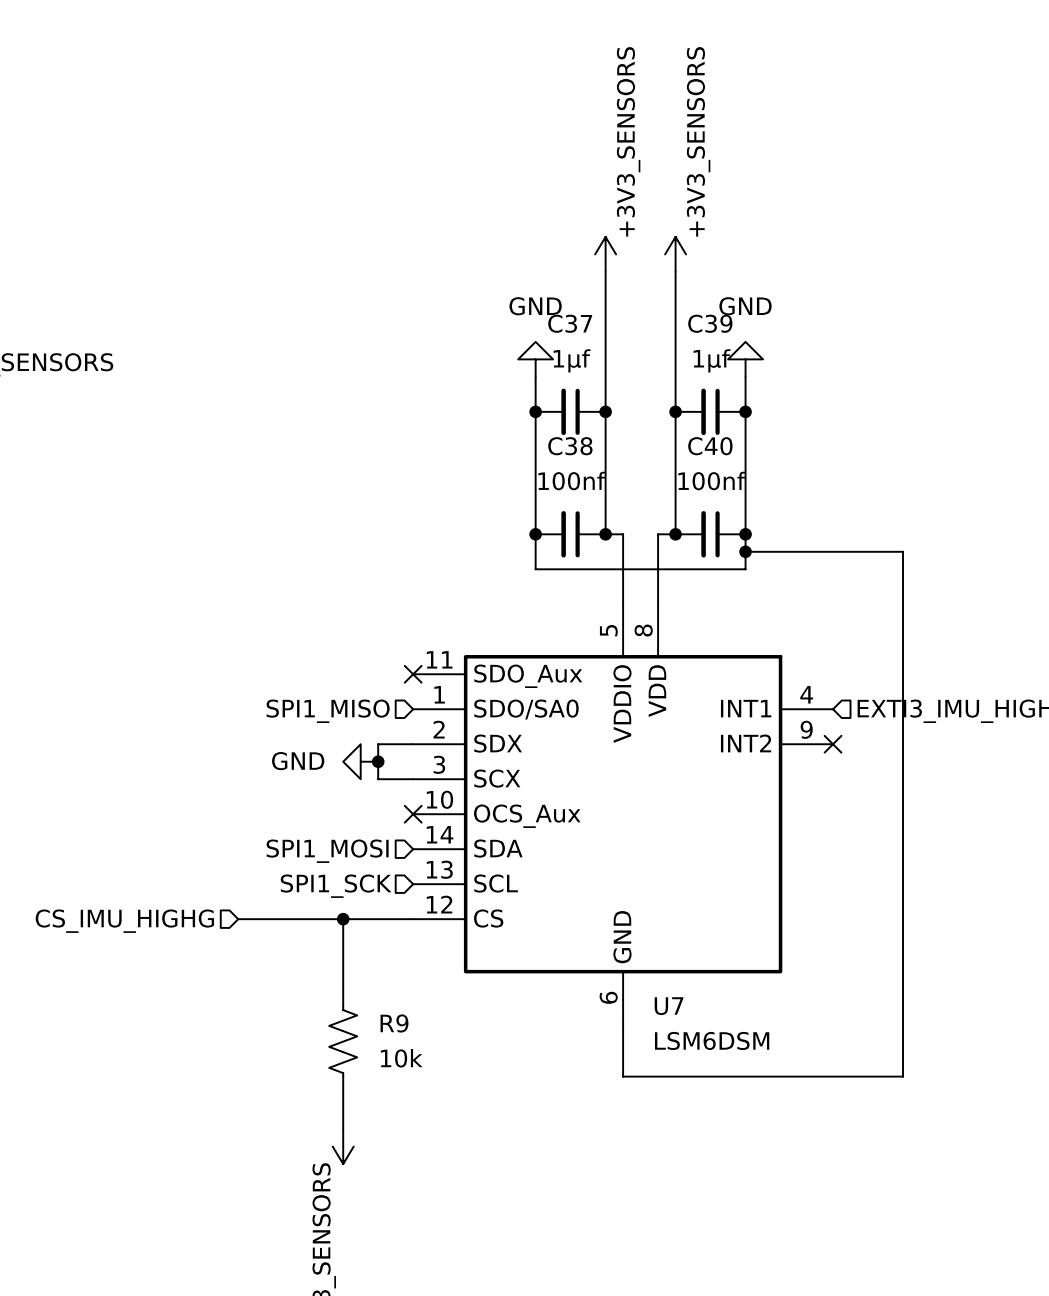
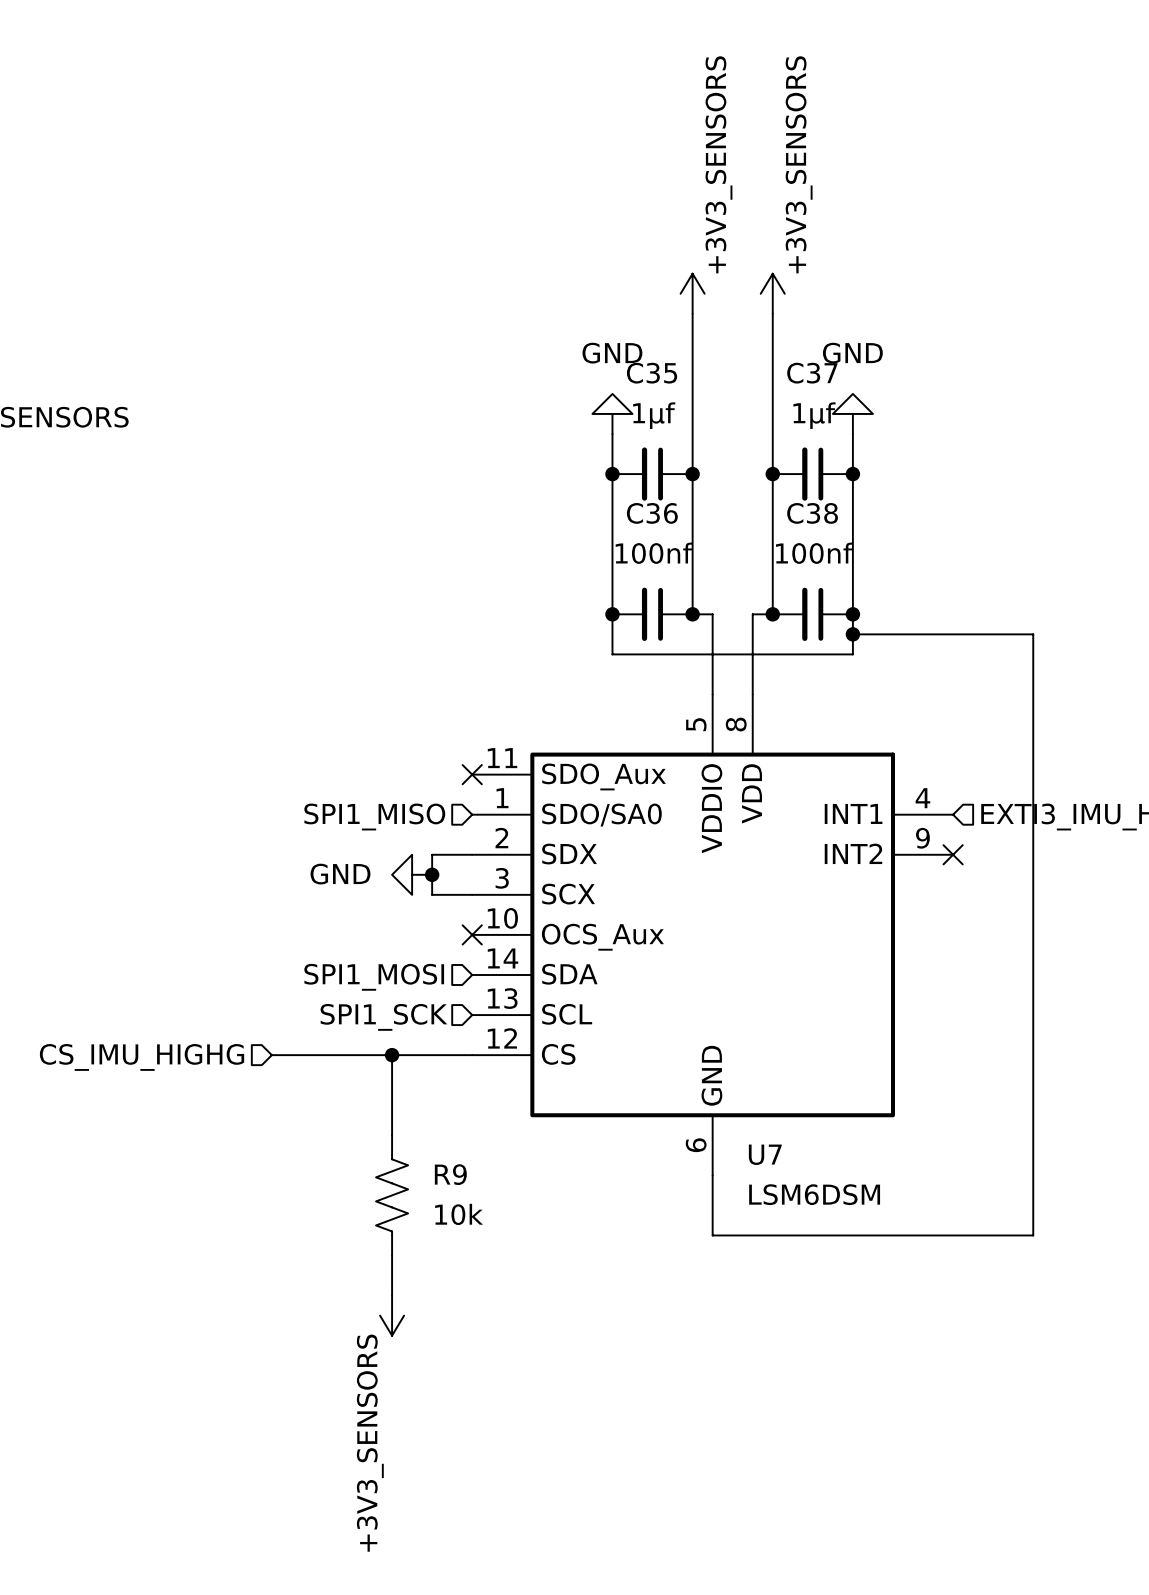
C37 name: C37 (570, 323) -> C35 (652, 373)
C39 name: C39 (710, 323) -> C37 (812, 373)
C38 name: C38 (570, 446) -> C36 (652, 513)
C40 name: C40 (710, 446) -> C38 (812, 513)

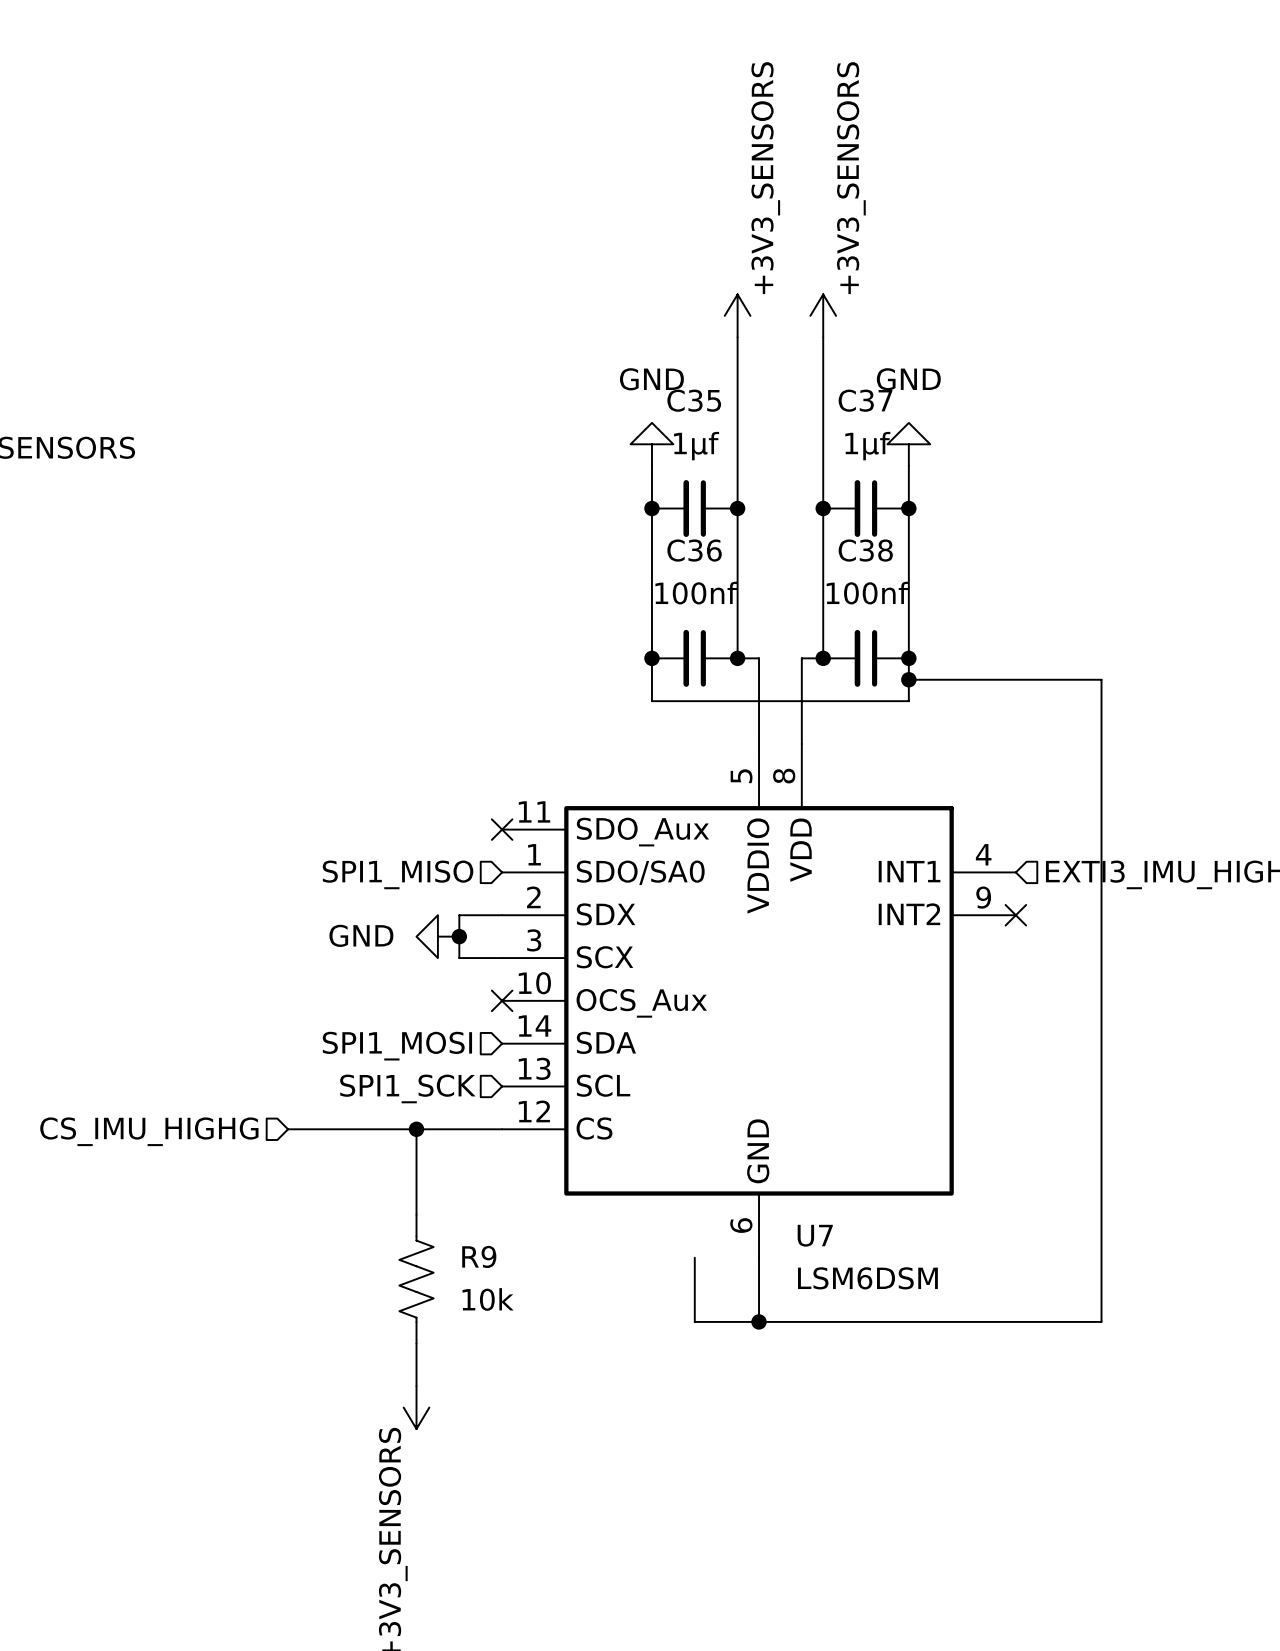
wire: none -> (694, 1257) (694, 1321) (759, 1321)
junction: none -> (759, 1321)

